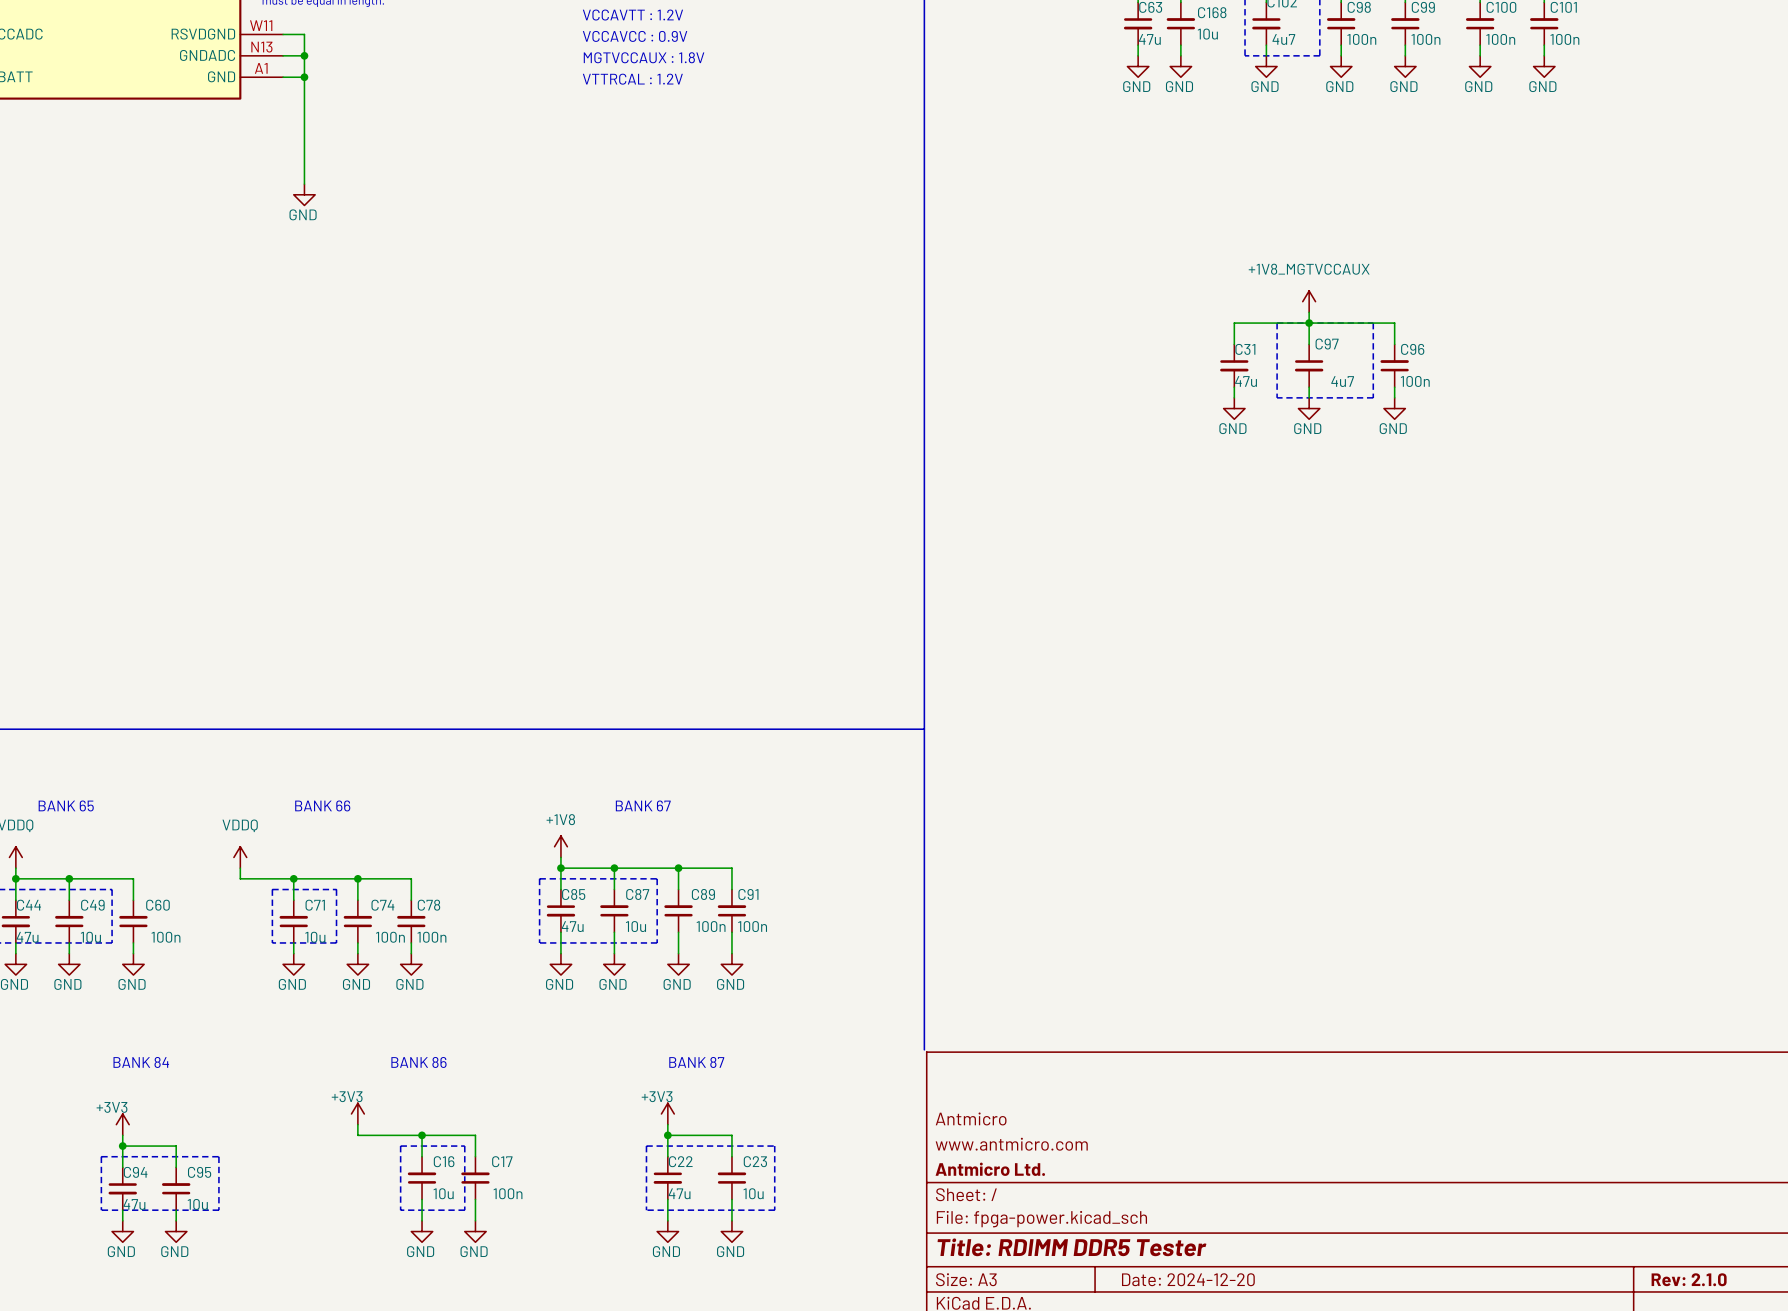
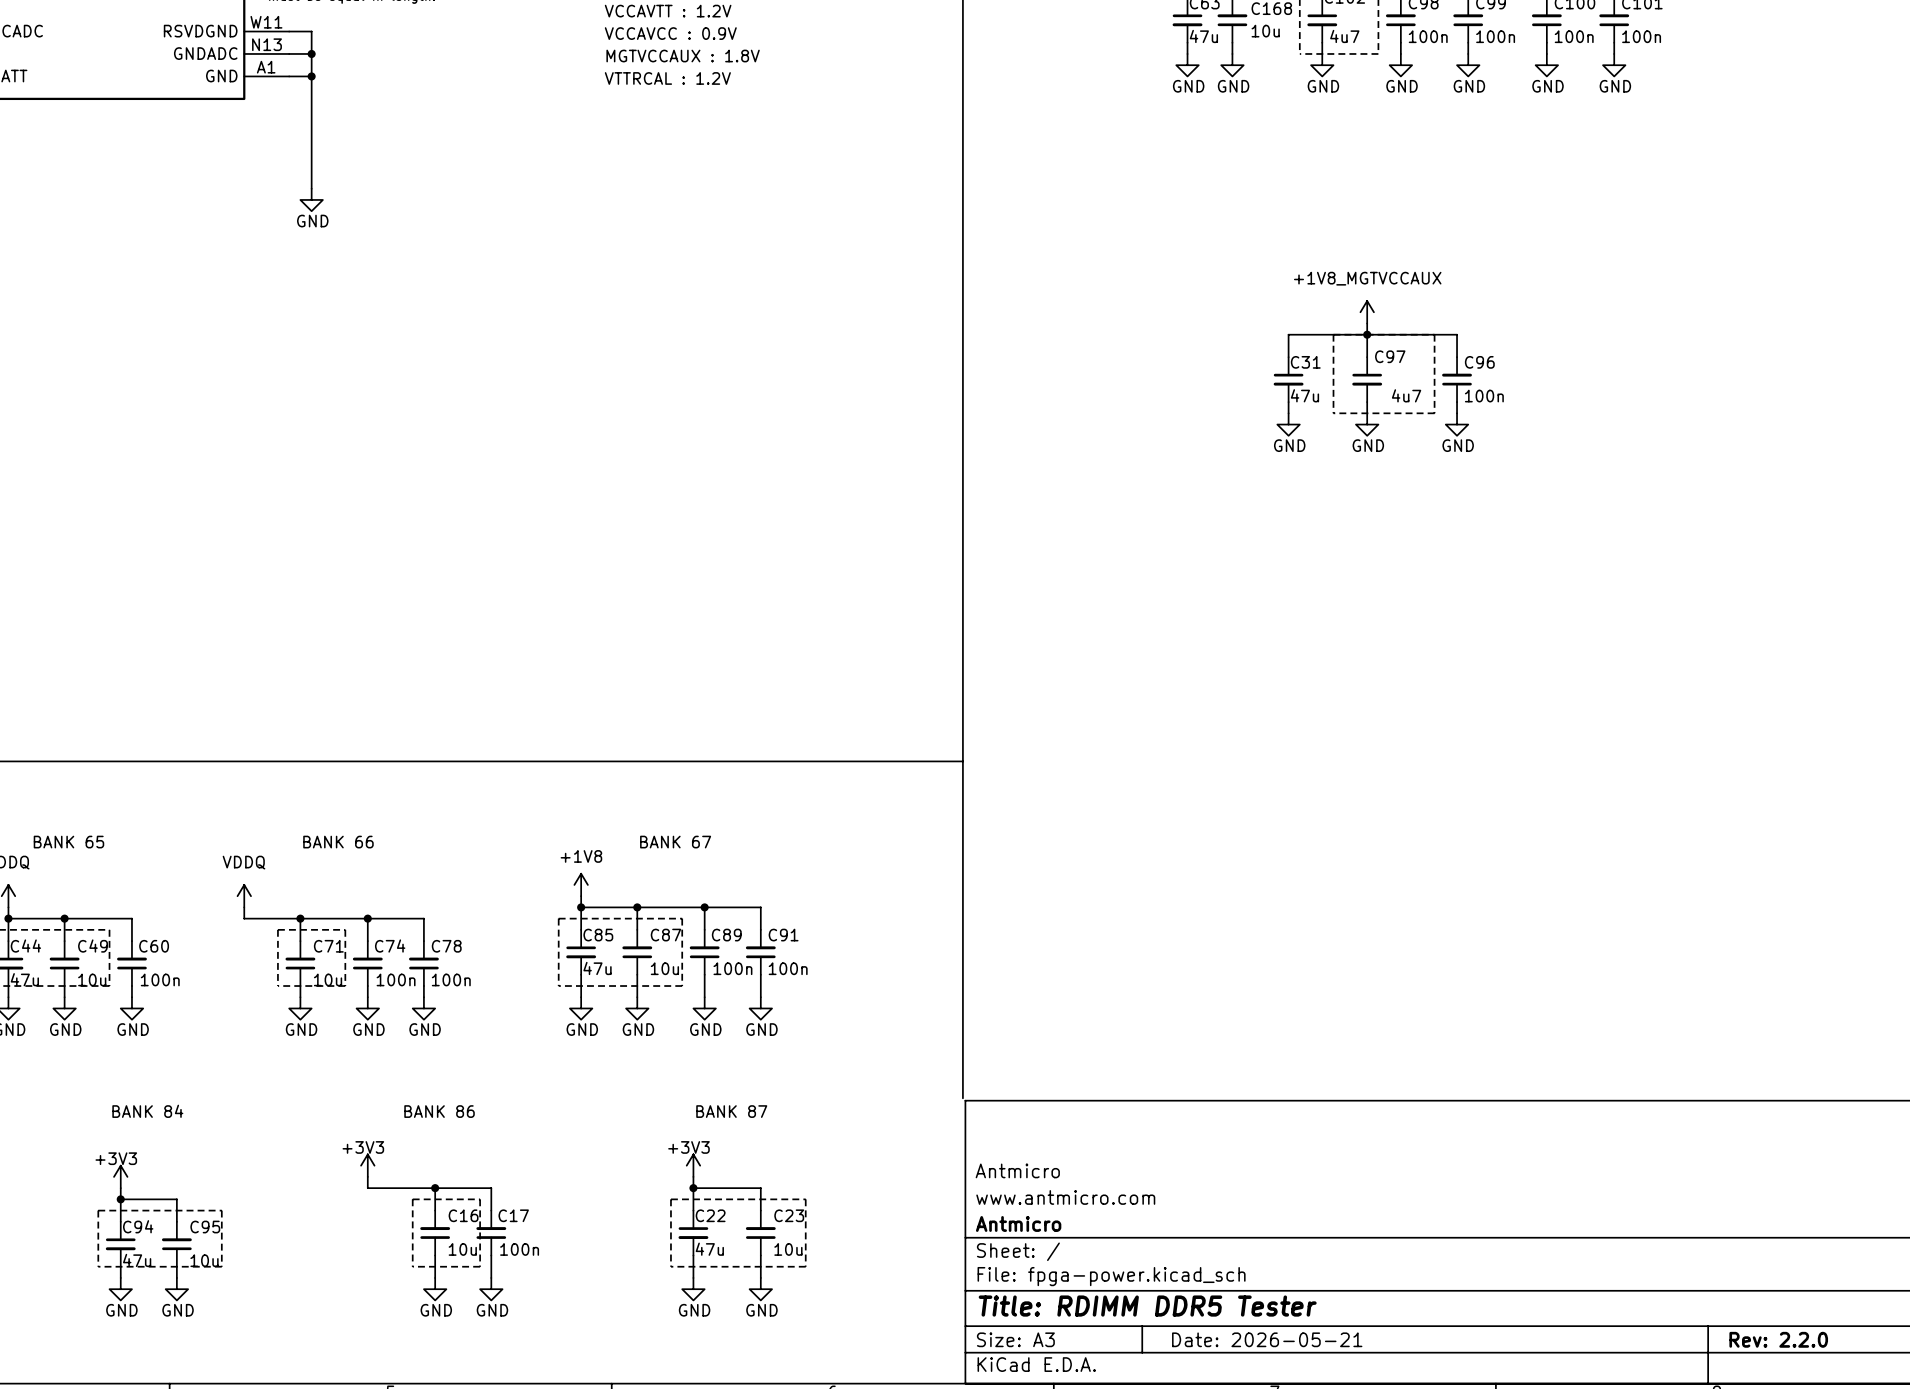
title block: Antmicro Ltd. (990, 1169) -> Antmicro (1018, 1223)
title block: Date: 2024-12-20 (1188, 1279) -> Date: 2026-05-21 (1267, 1339)
title block: Rev: 2.1.0 (1689, 1279) -> Rev: 2.2.0 (1778, 1339)

